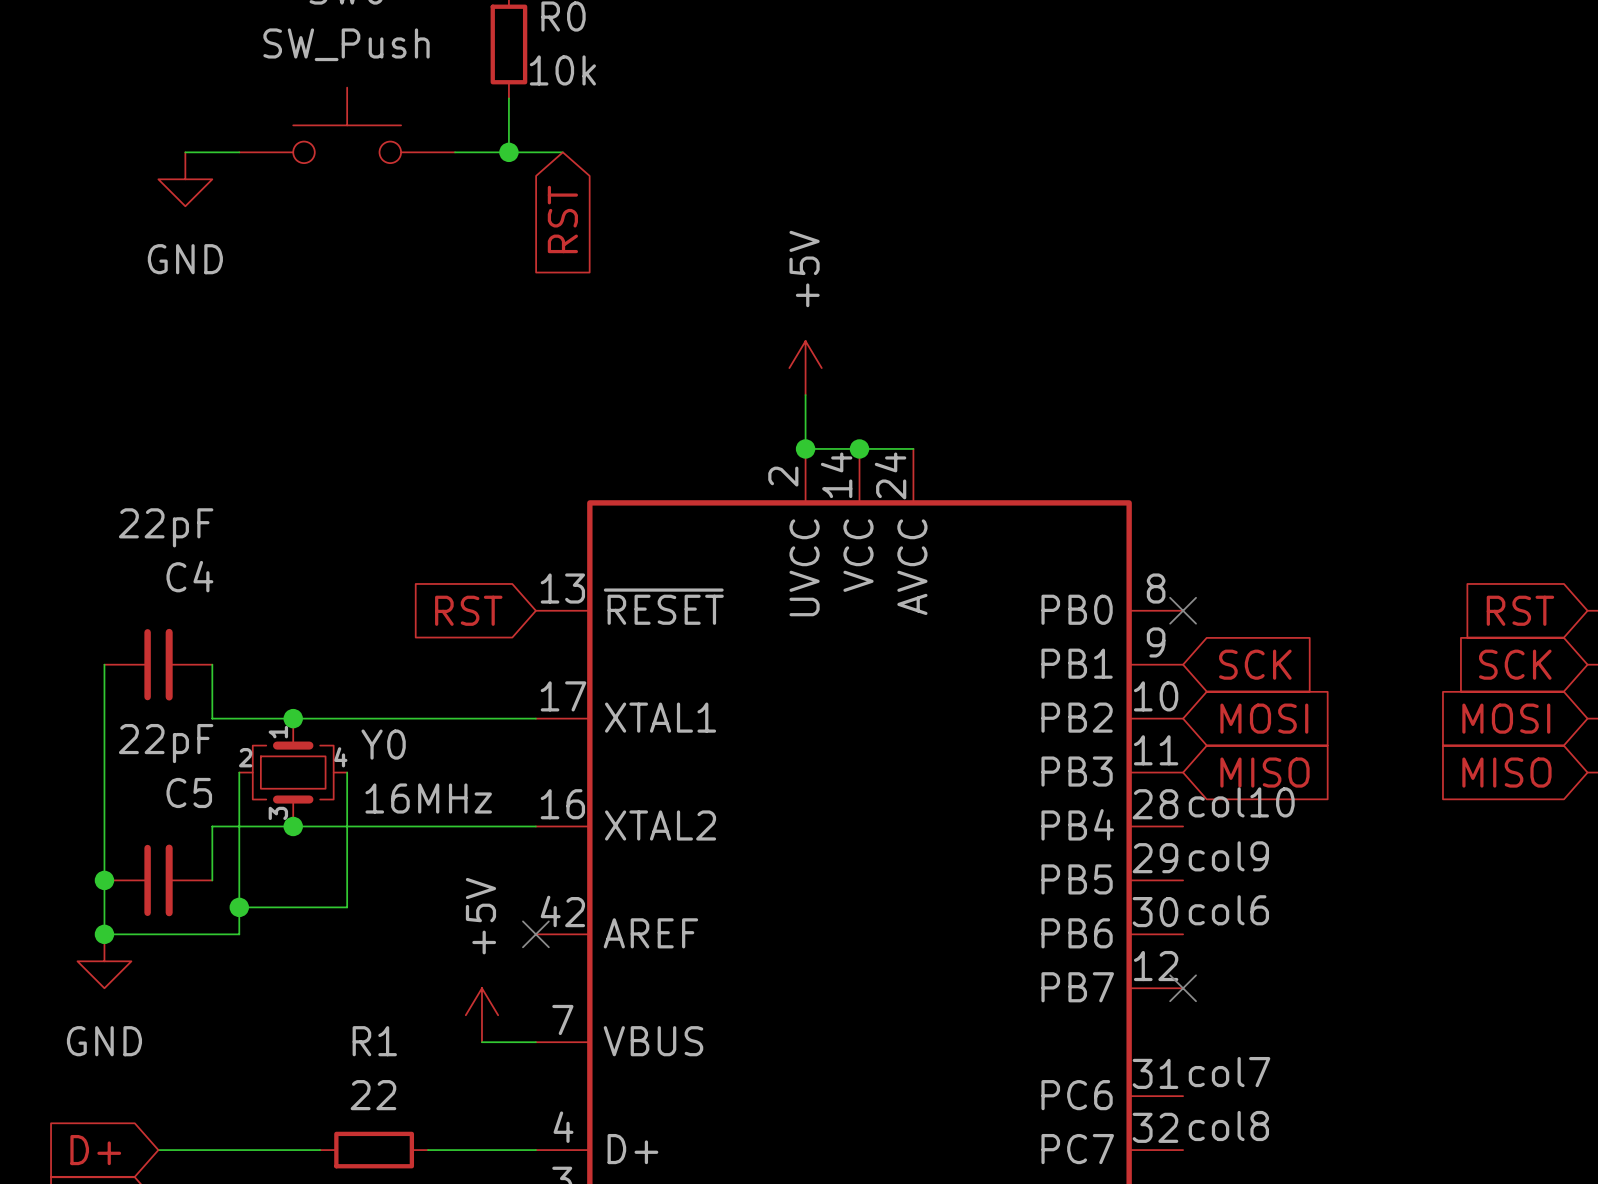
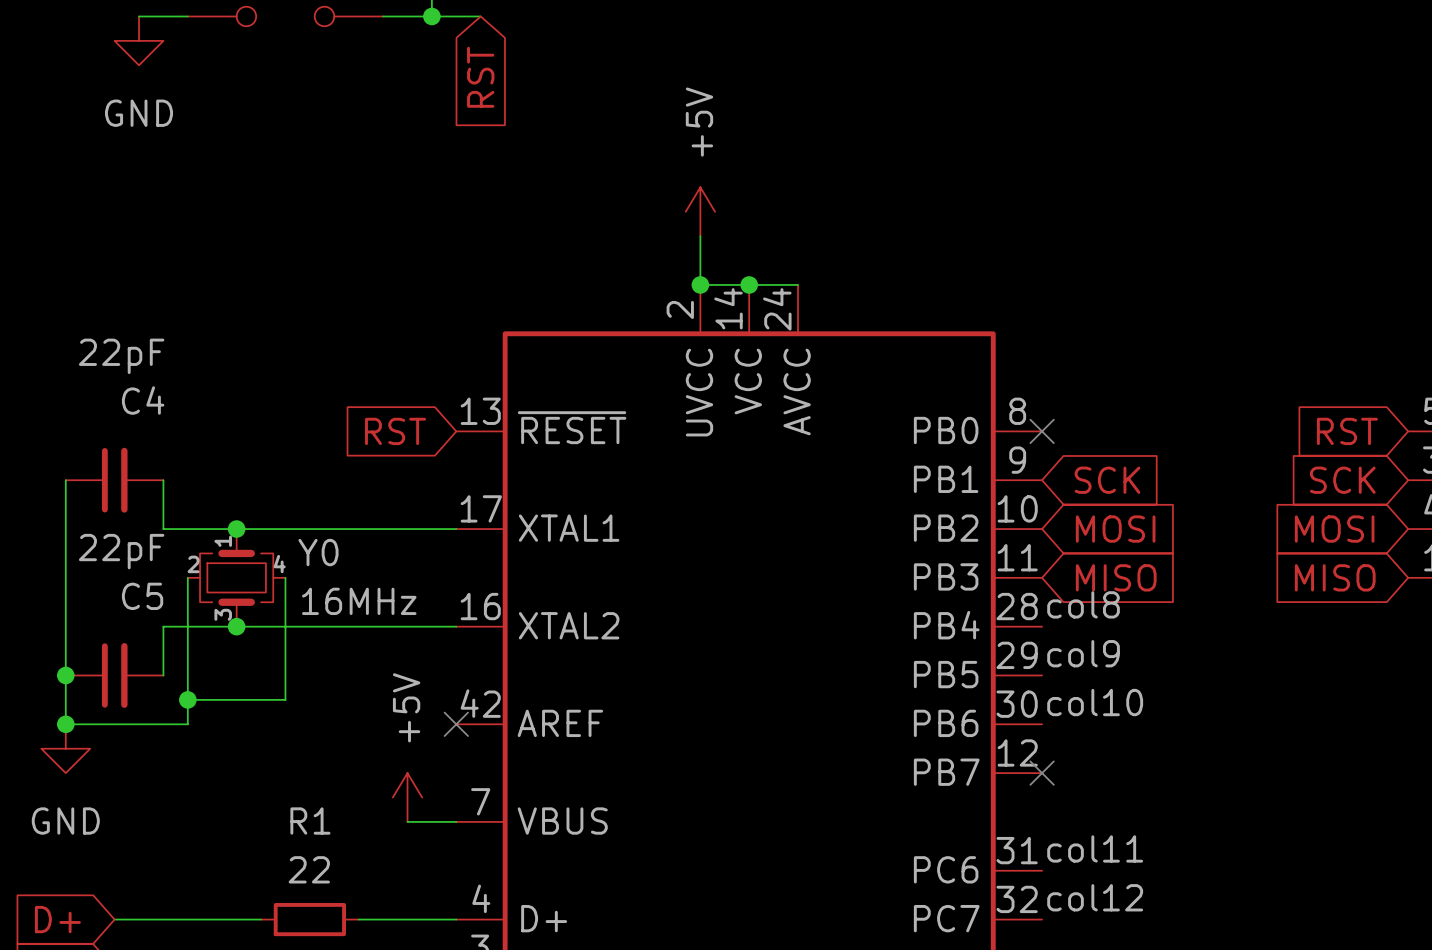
label: col10 (1241, 802) -> col8 (1083, 604)
label: col6 (1228, 910) -> col10 (1095, 702)
label: col7 (1229, 1072) -> col11 (1095, 848)
label: col8 (1228, 1126) -> col12 (1095, 897)

